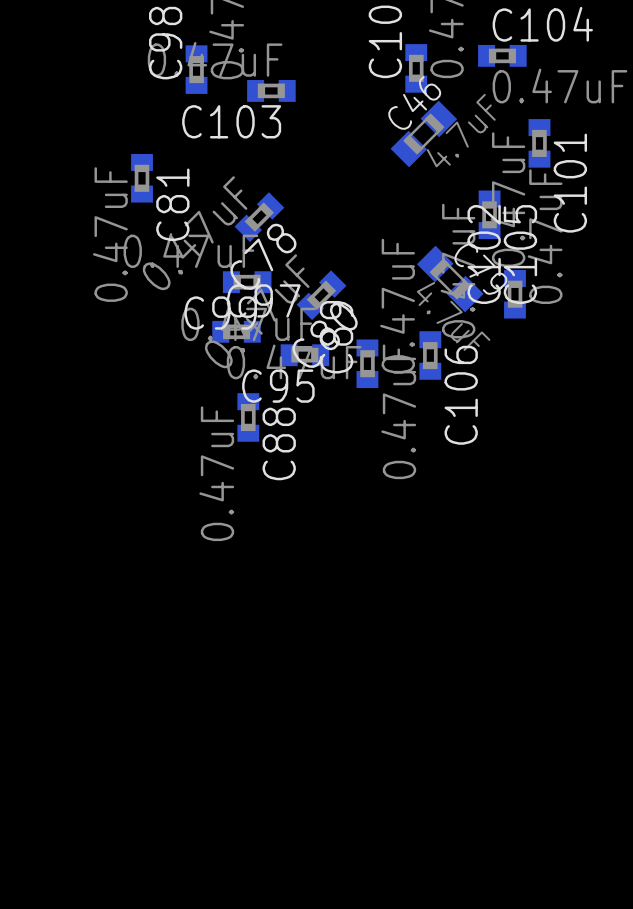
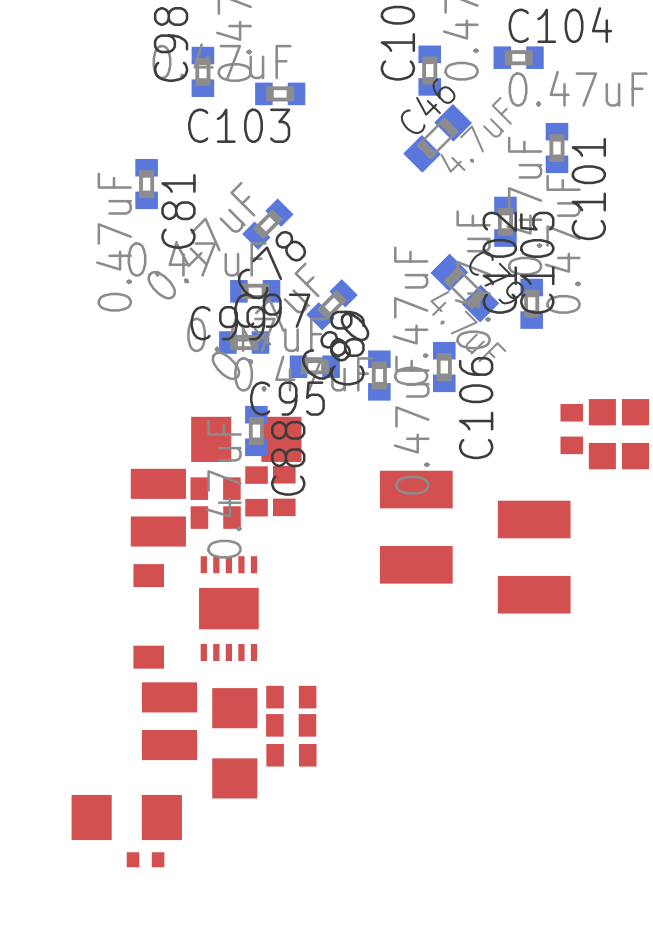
part: none -> (571, 429)
part: none -> (602, 434)
part: none -> (635, 434)
part: none -> (246, 439)
part: none -> (215, 488)
part: none -> (256, 491)
part: none -> (284, 491)
part: none -> (158, 507)
part: none -> (215, 517)
part: none -> (416, 527)
part: none -> (534, 557)
part: none -> (228, 608)
part: none -> (148, 616)
part: none -> (291, 697)
part: none -> (169, 721)
part: none -> (291, 725)
part: none -> (234, 743)
part: none -> (291, 755)
part: none -> (126, 817)
part: none -> (145, 859)

